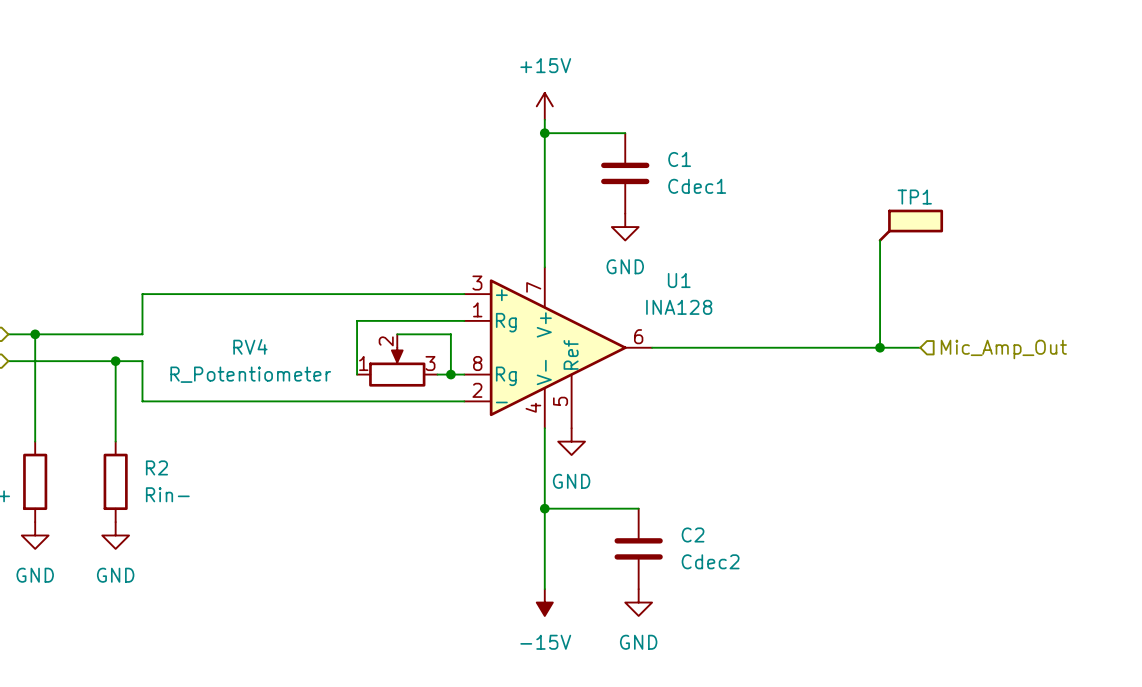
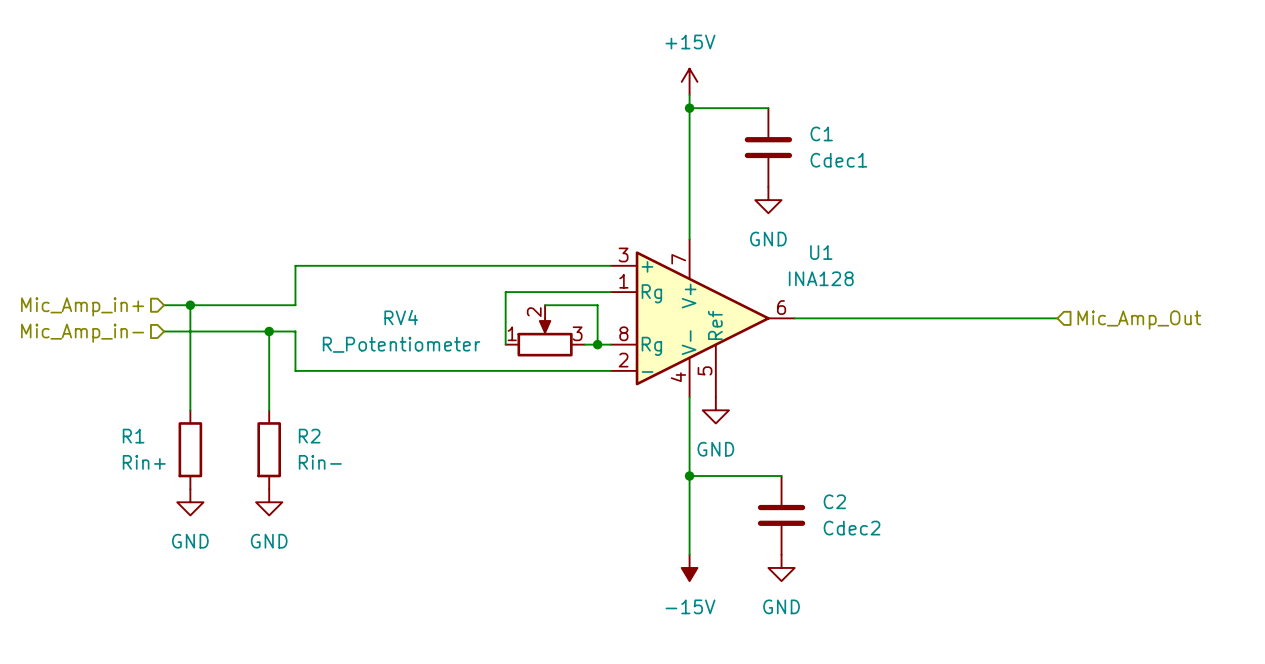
TP1: (910, 225) -> none
wire: (880, 240) (880, 347) -> none
junction: (880, 347) -> none

